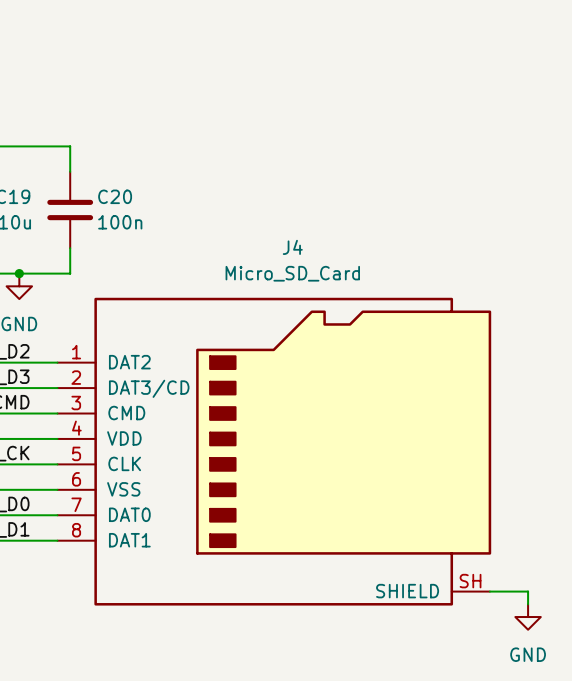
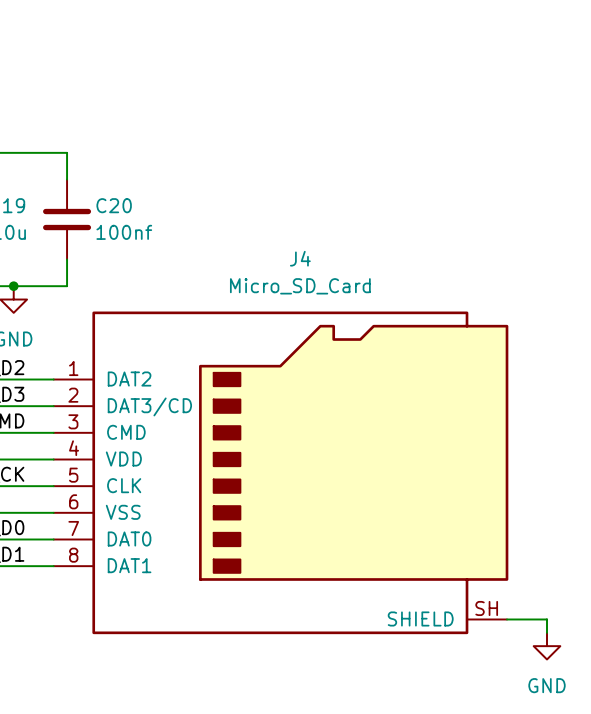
C20 value: 100n (120, 222) -> 100nf (124, 232)

